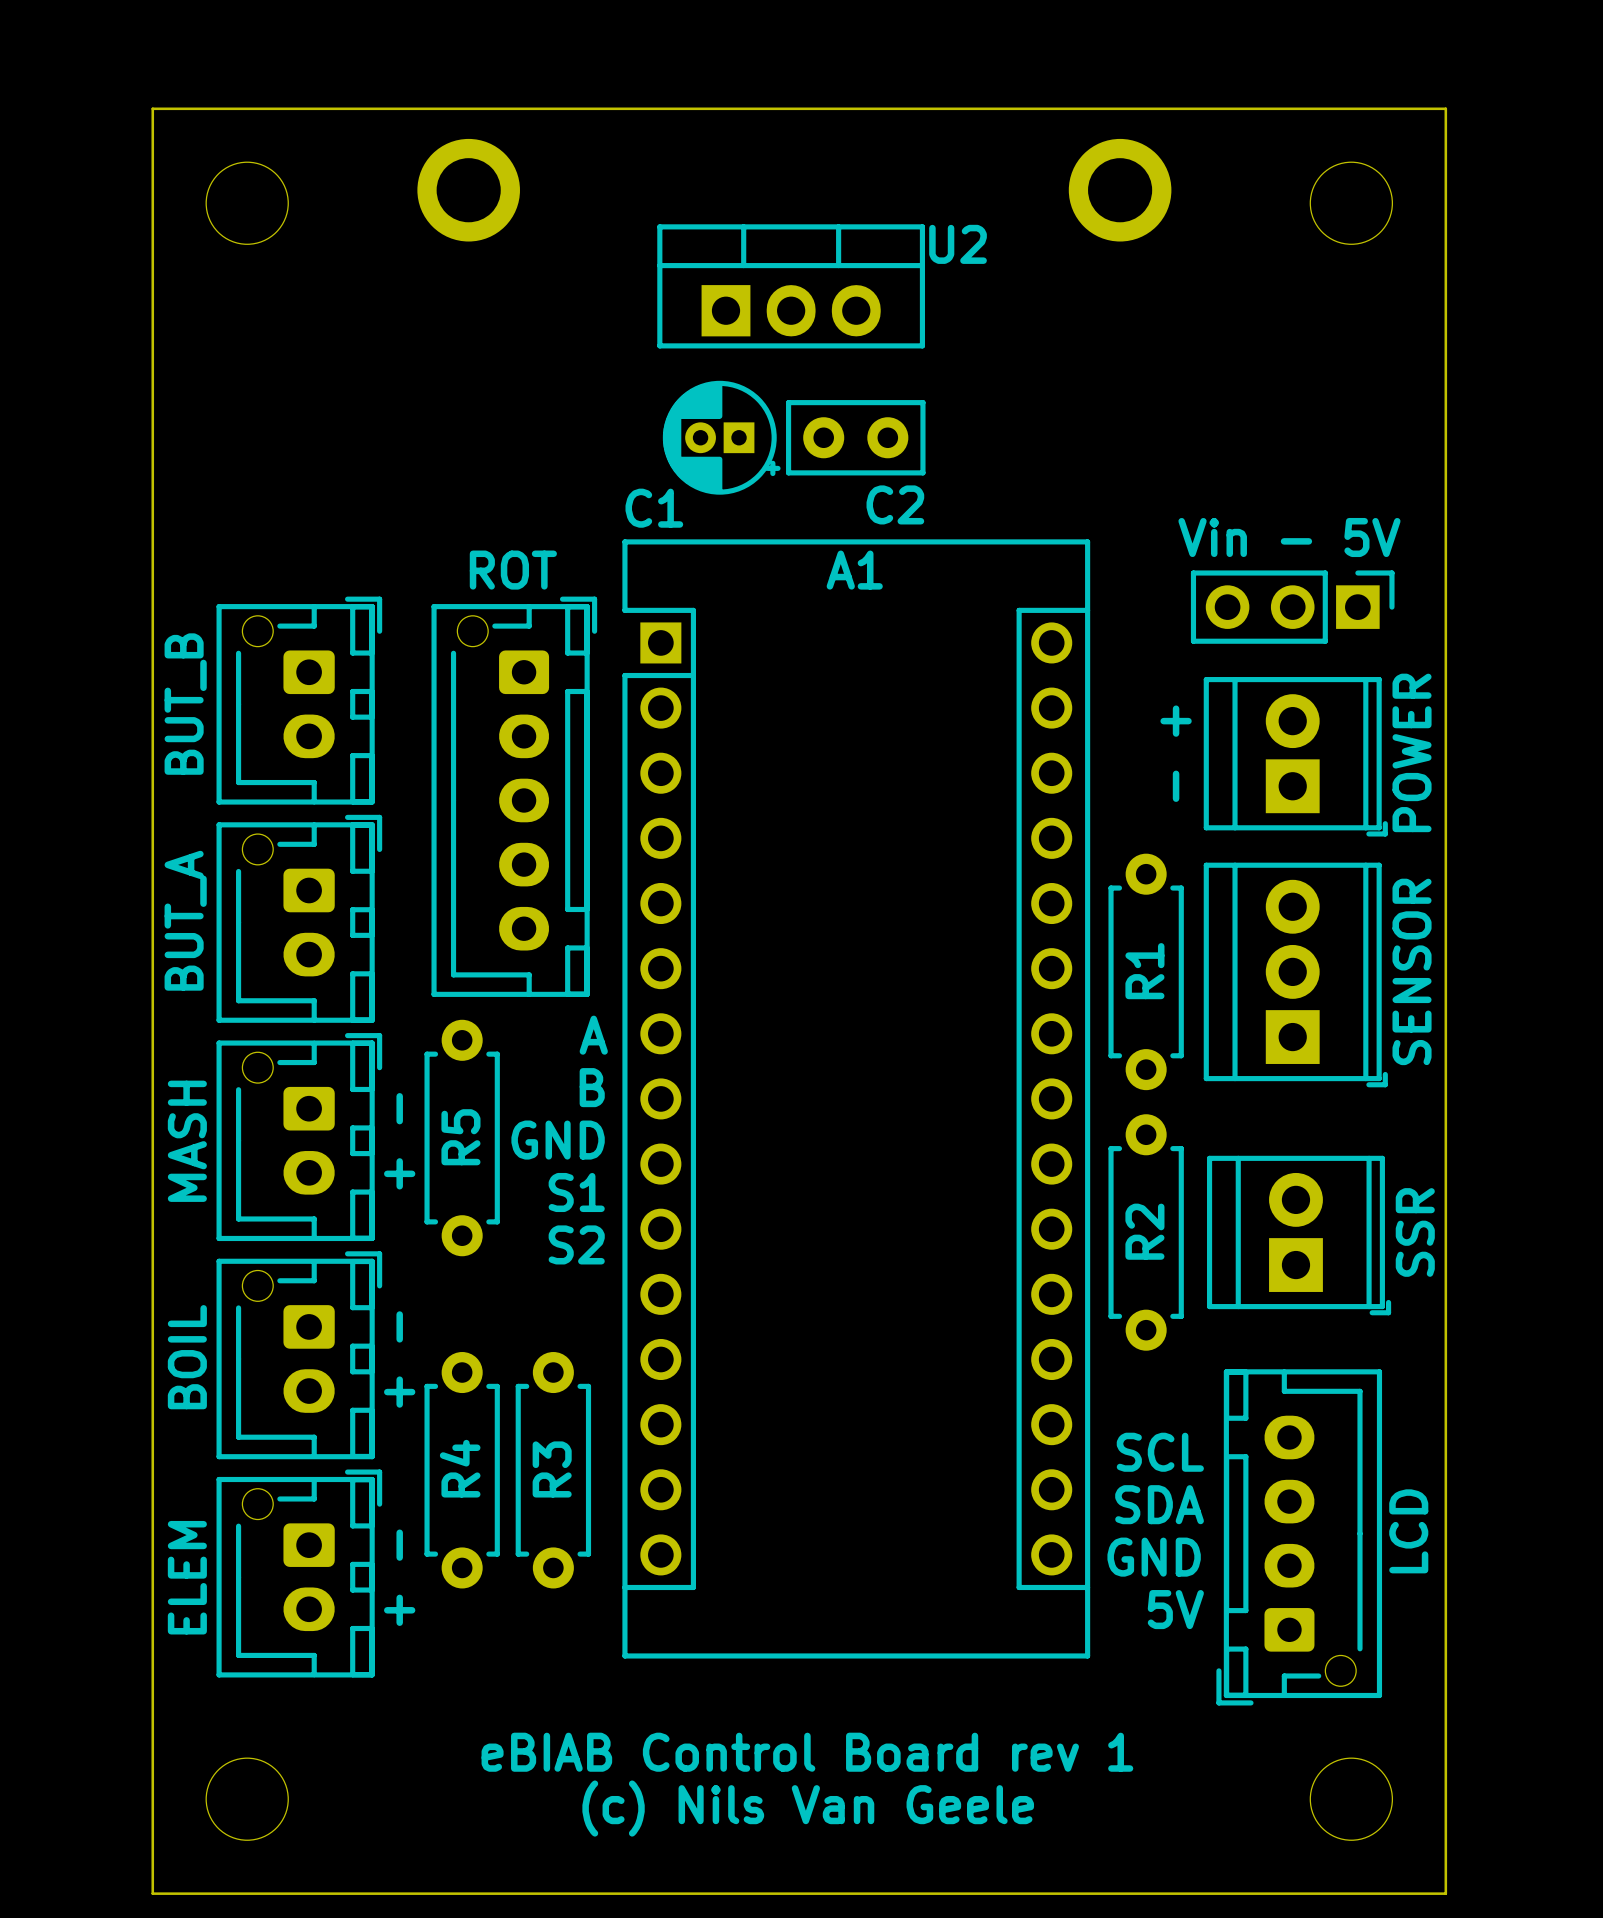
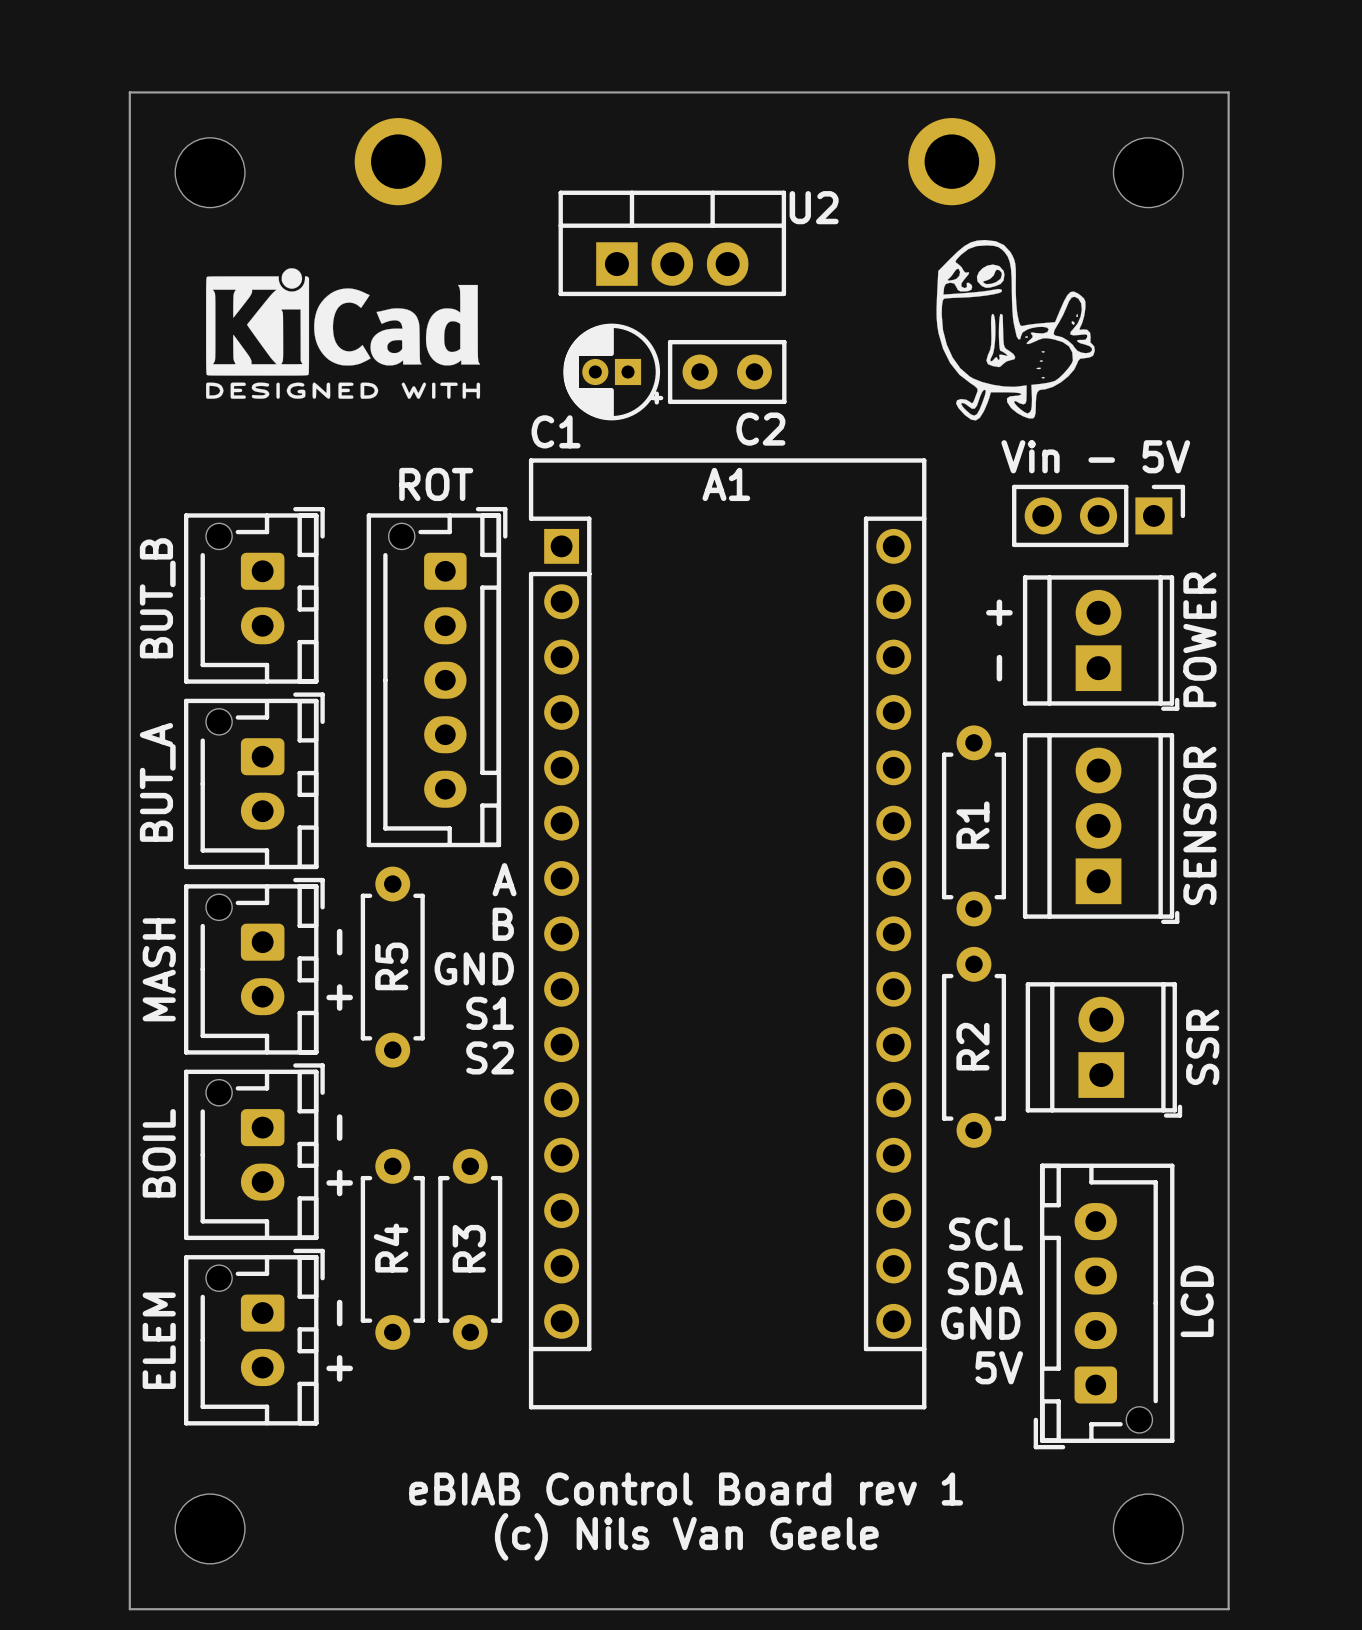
drawing: none -> [936, 239, 1095, 421]
drawing: none -> [206, 268, 481, 399]

